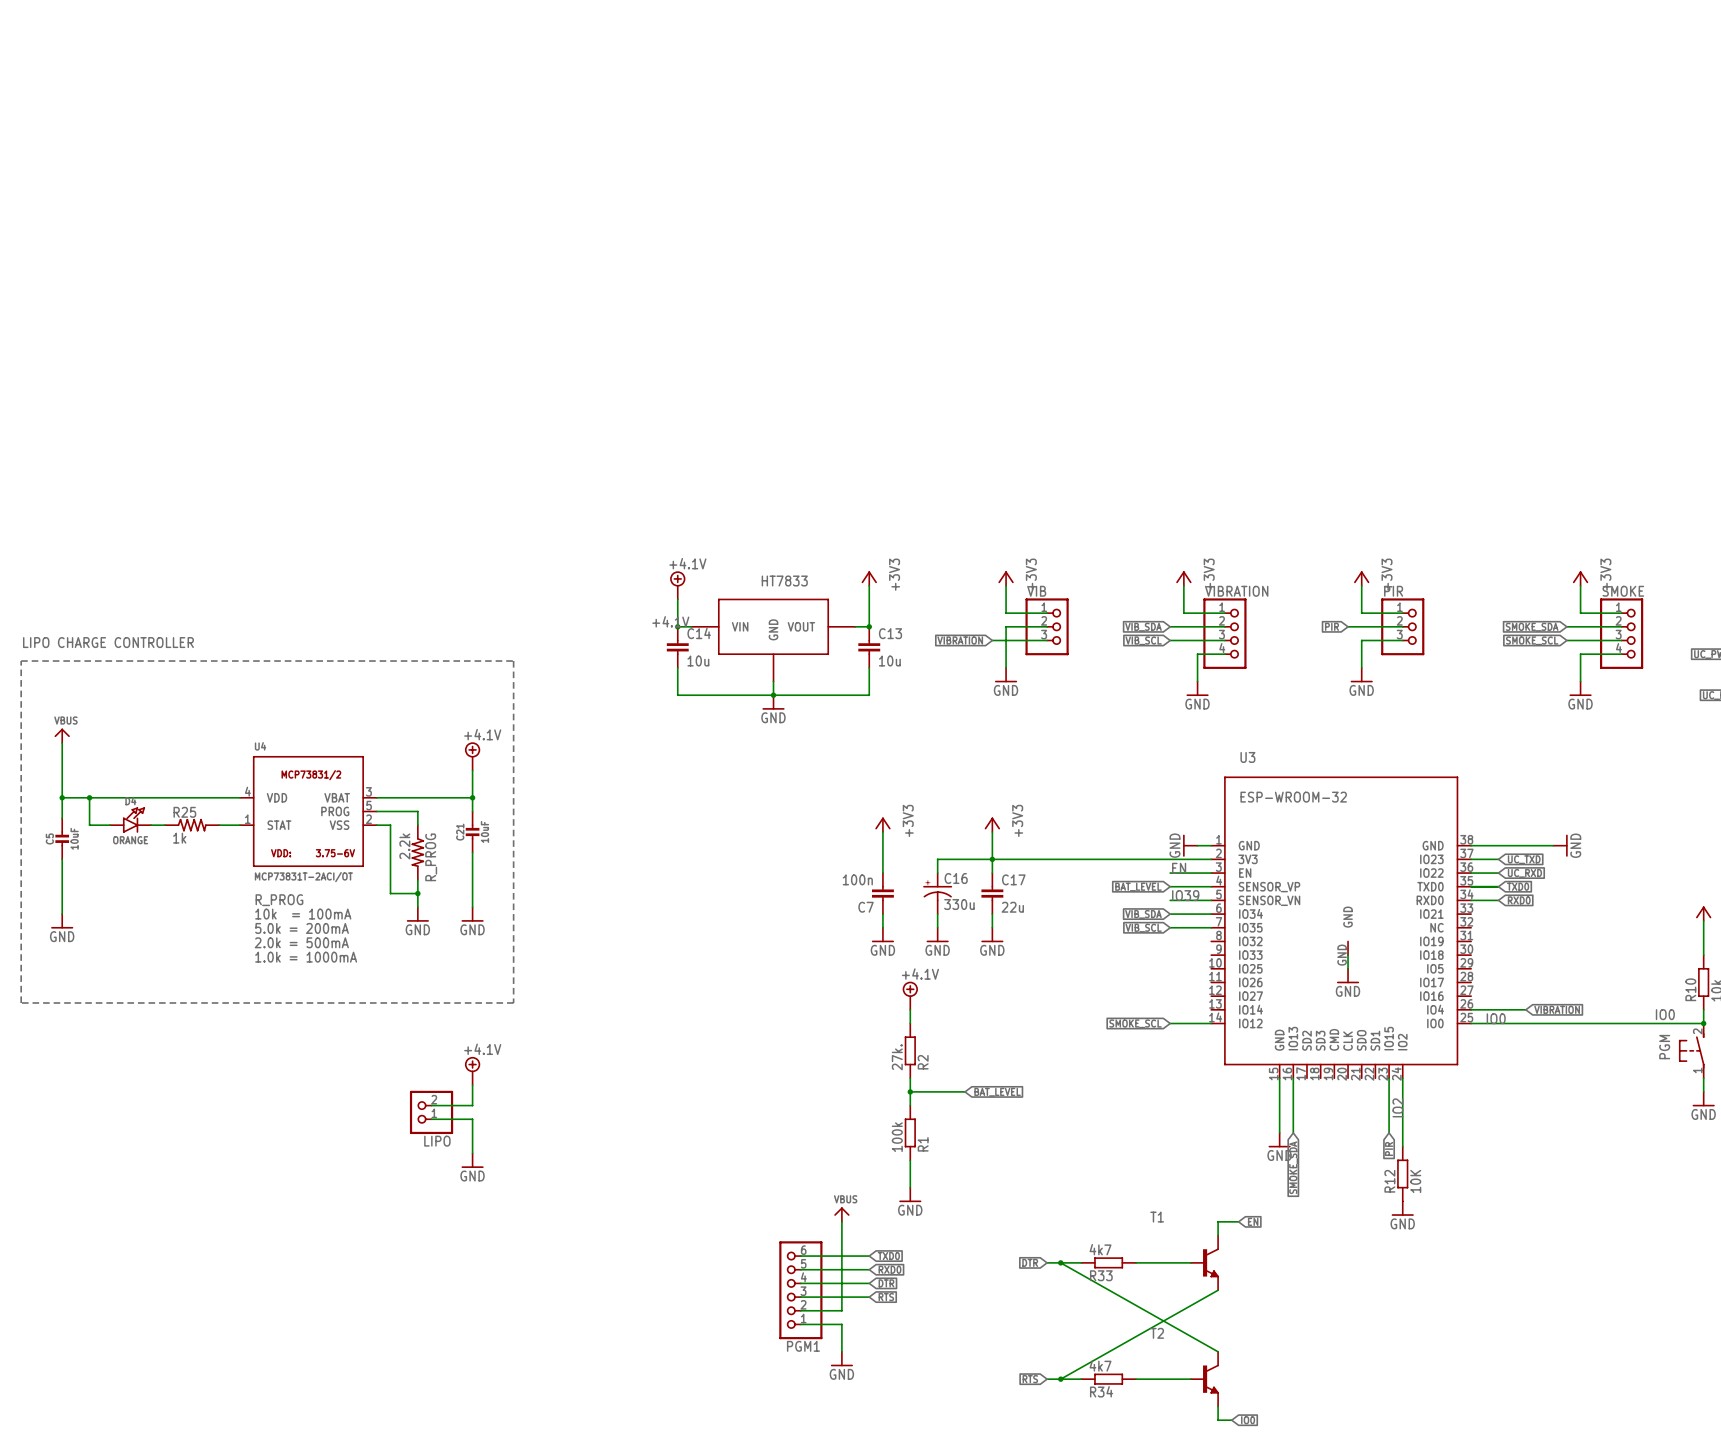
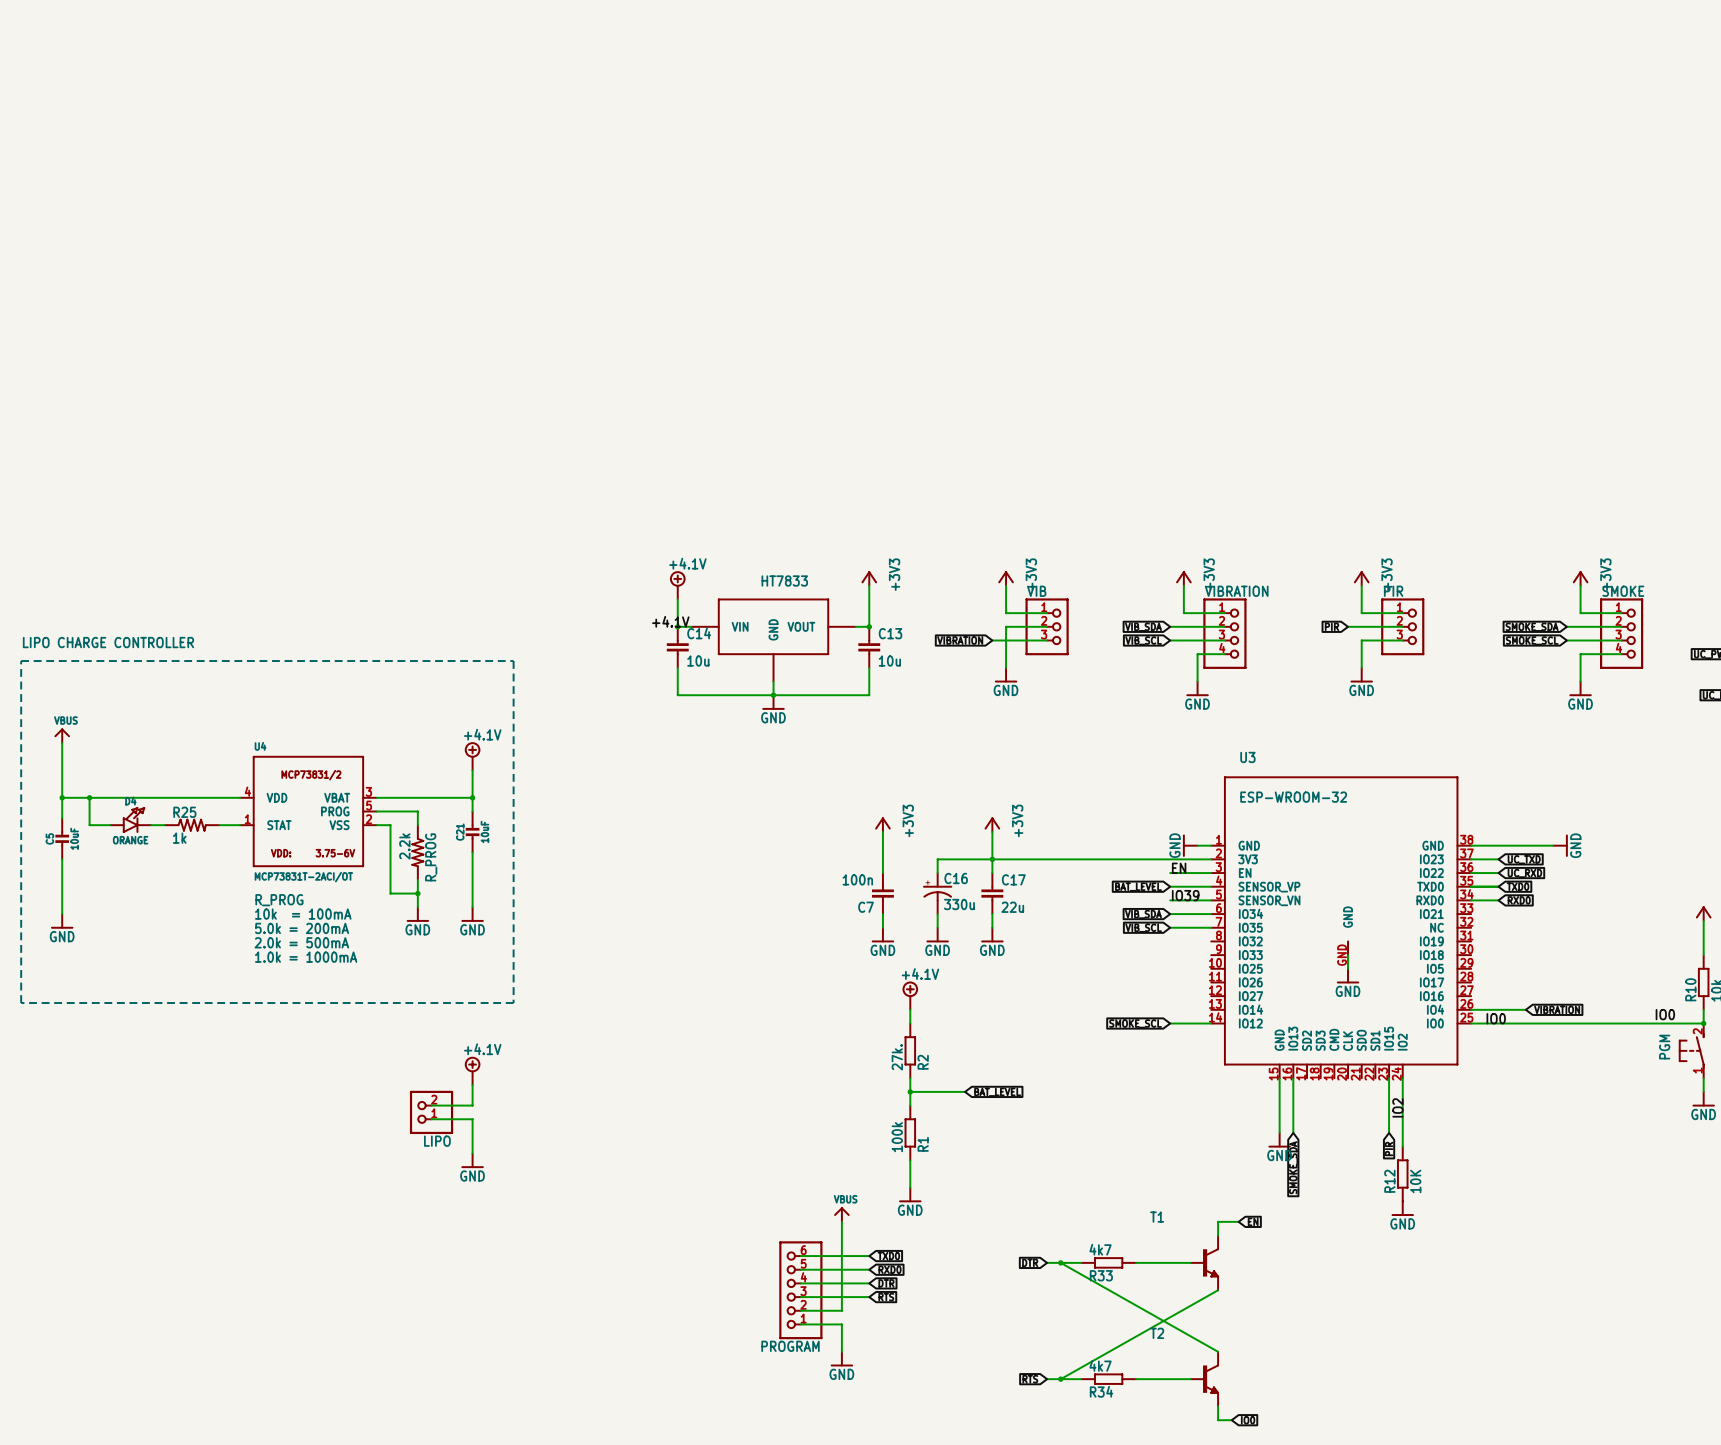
PGM1 name: PGM1 (803, 1346) -> PROGRAM (790, 1346)

